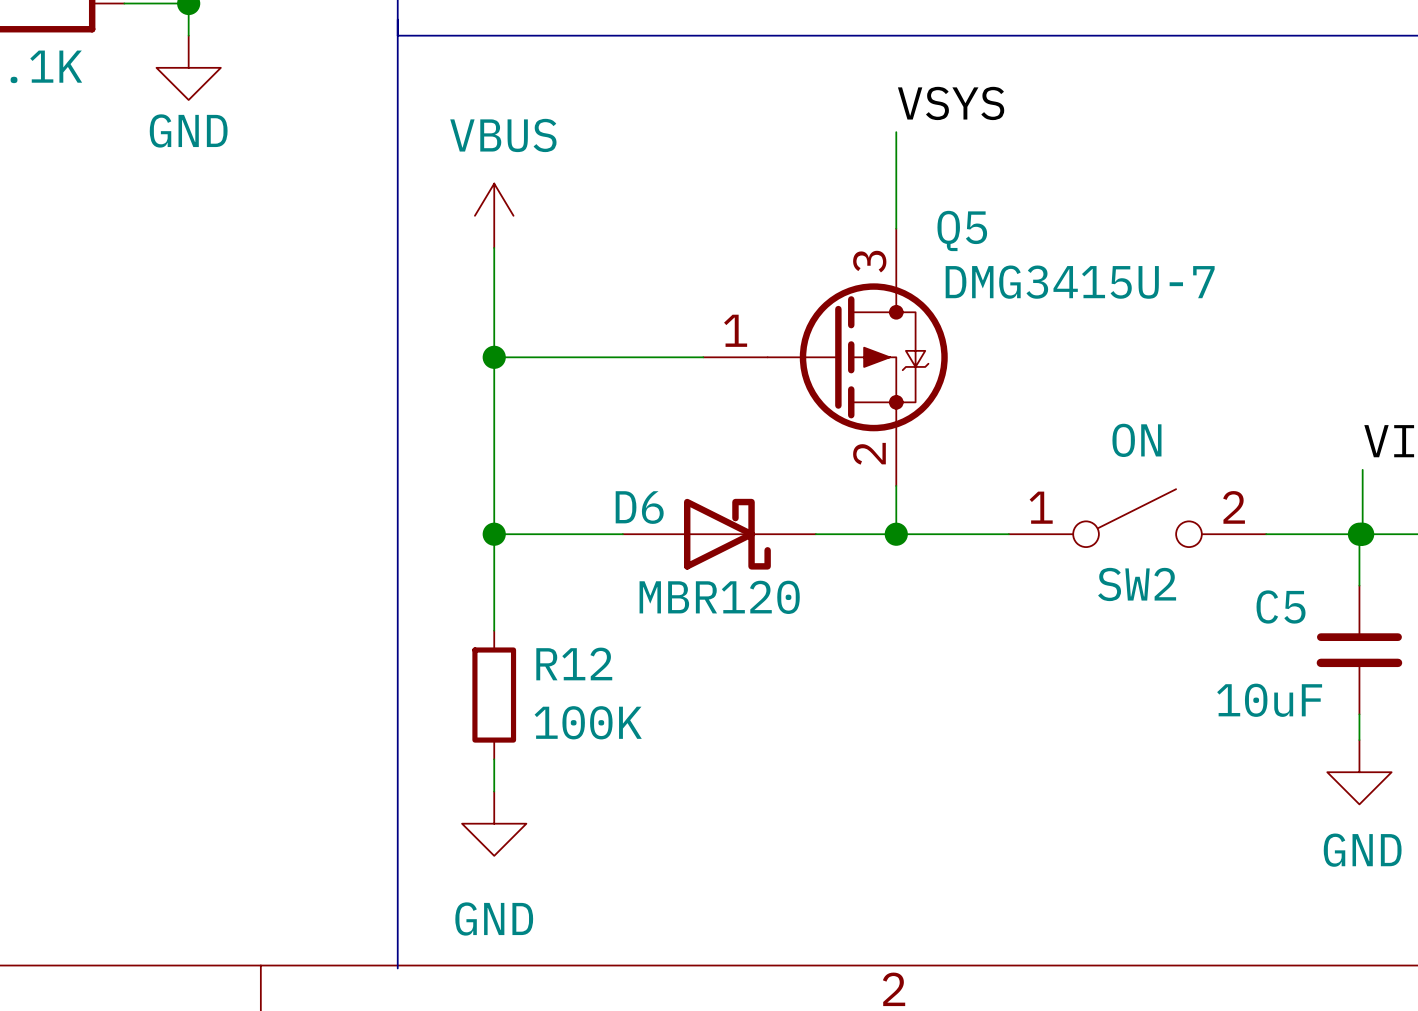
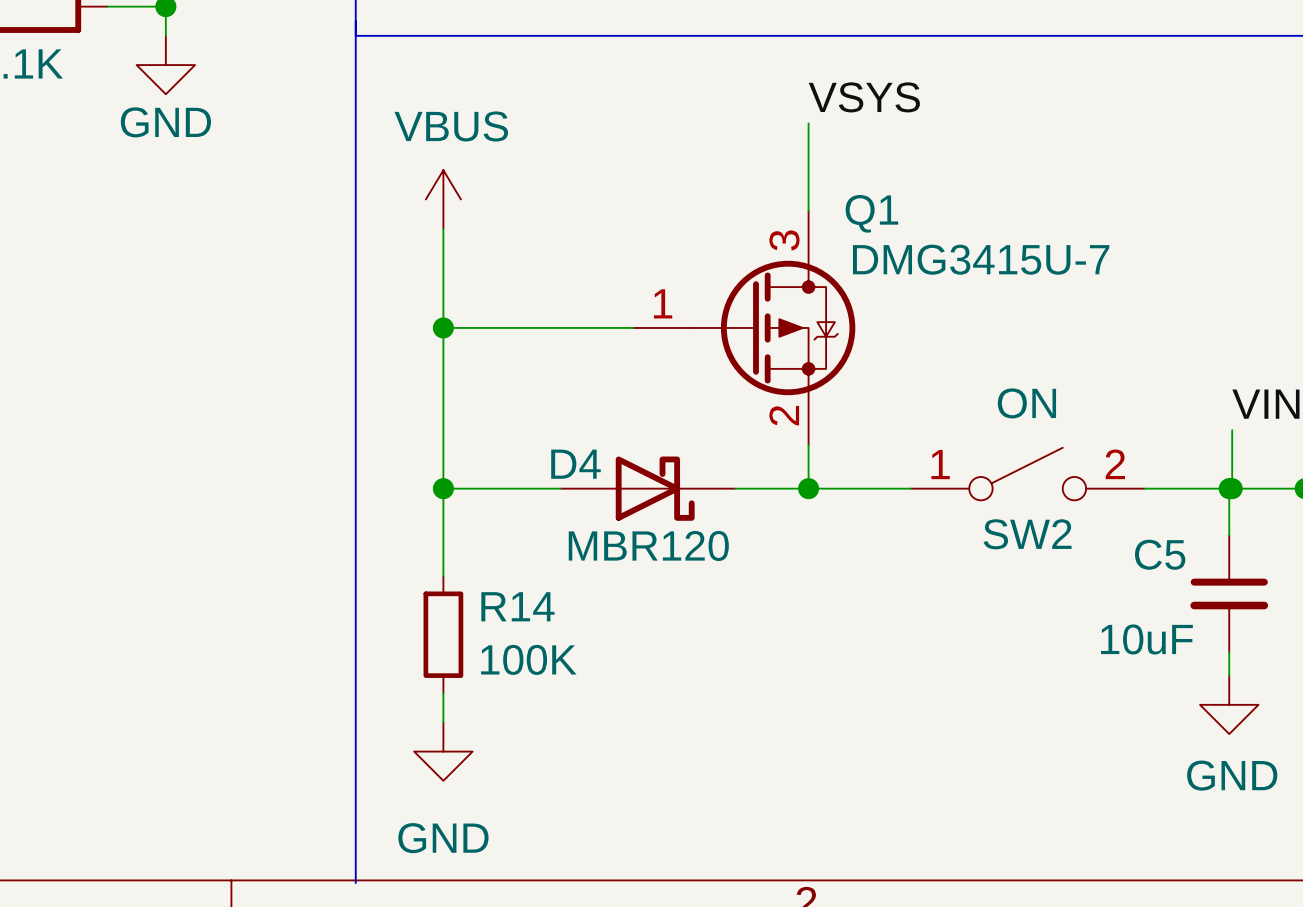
Q5 name: Q5 (962, 230) -> Q1 (871, 213)
D6 name: D6 (639, 507) -> D4 (575, 464)
R12 name: R12 (574, 663) -> R14 (517, 606)

